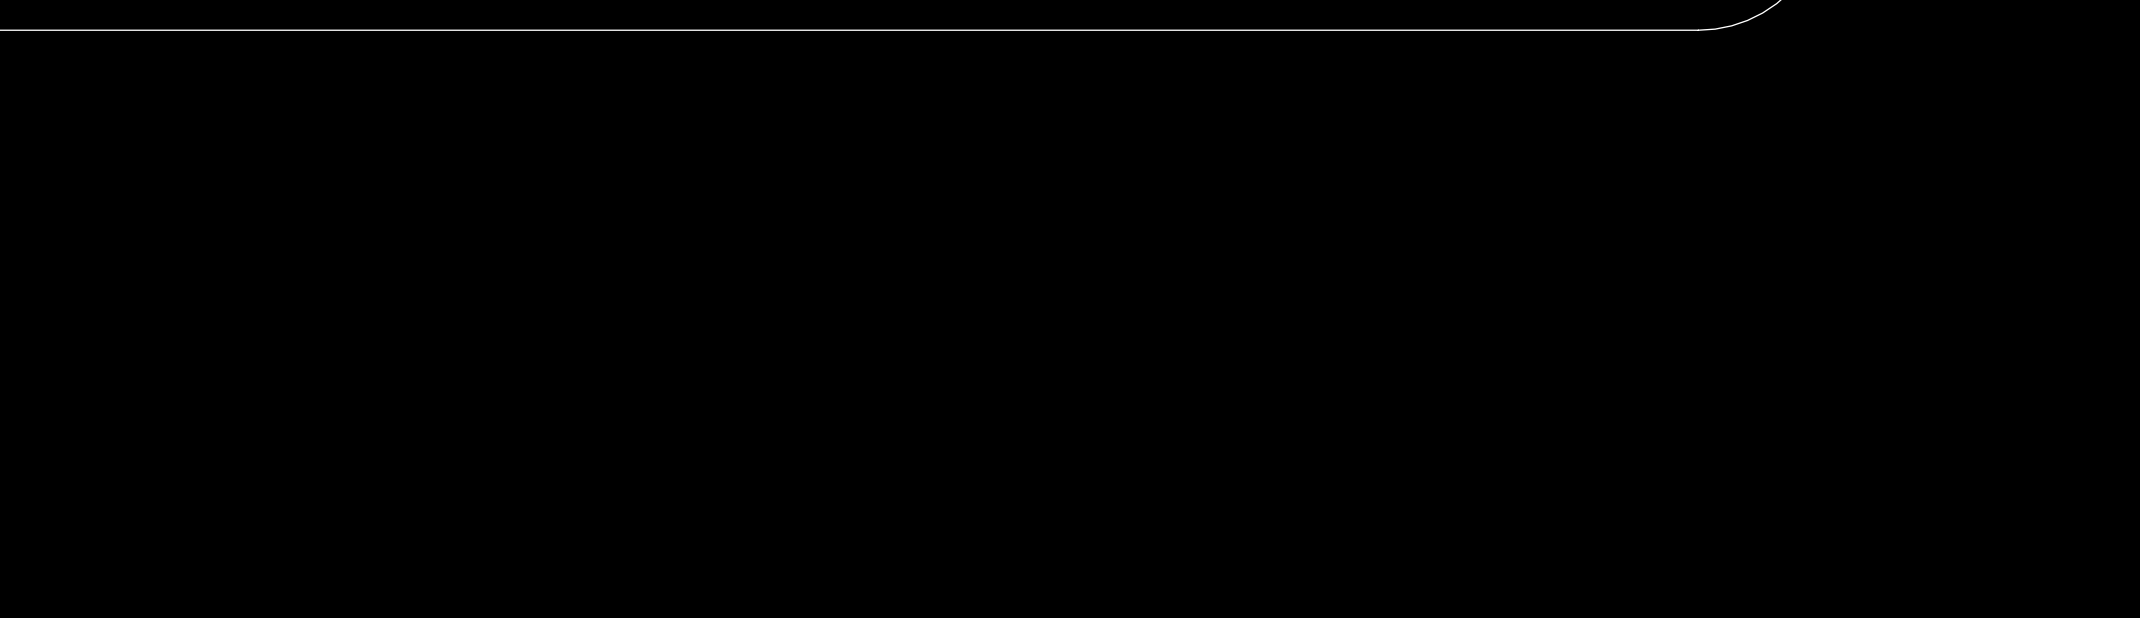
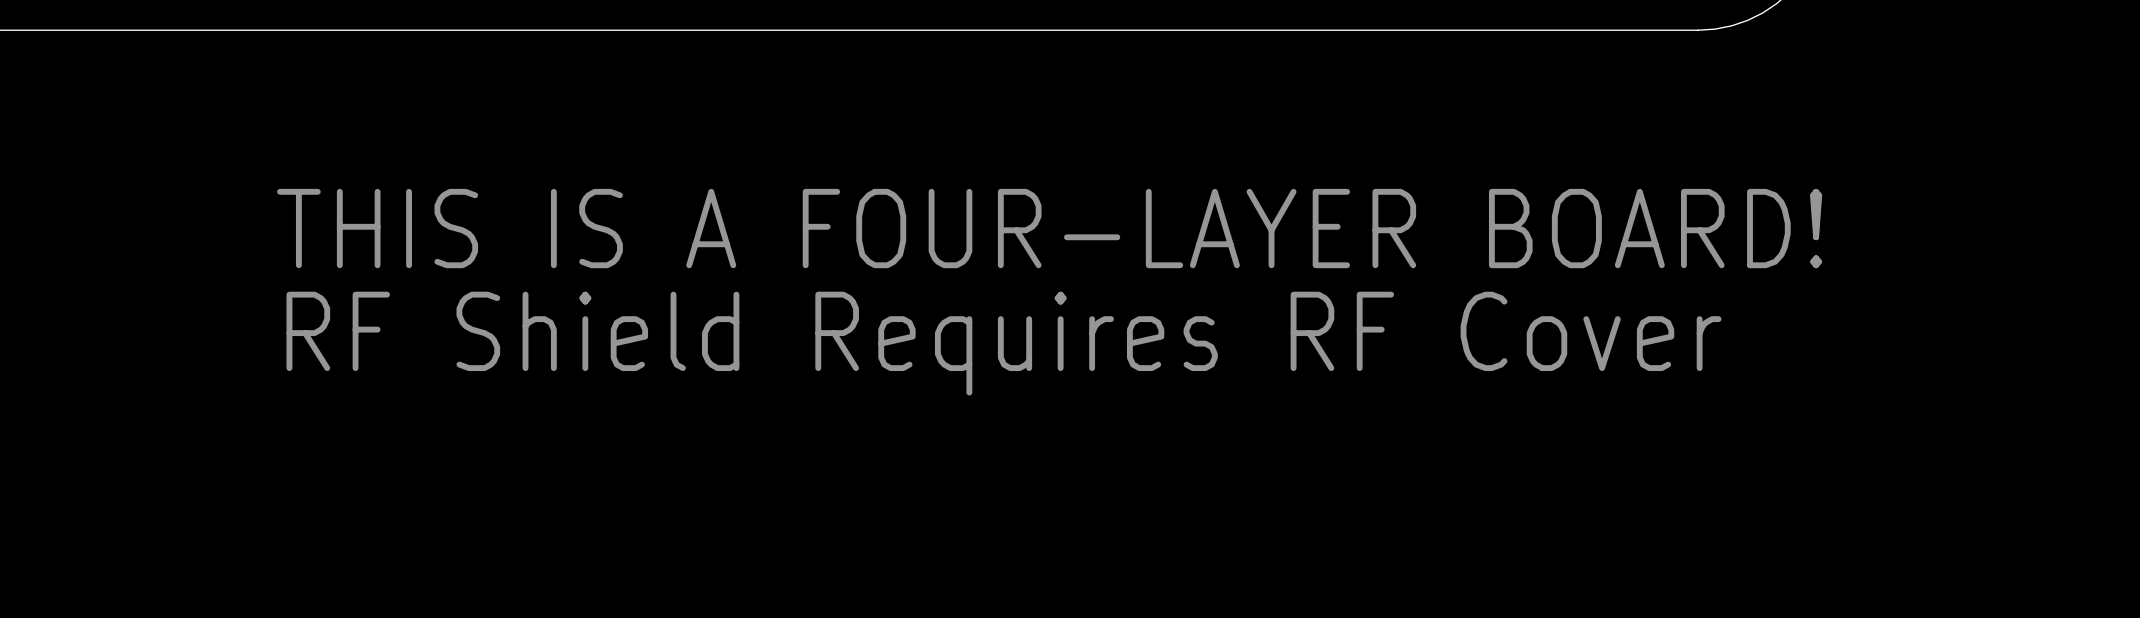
drawing: none -> [277, 188, 1823, 396]

